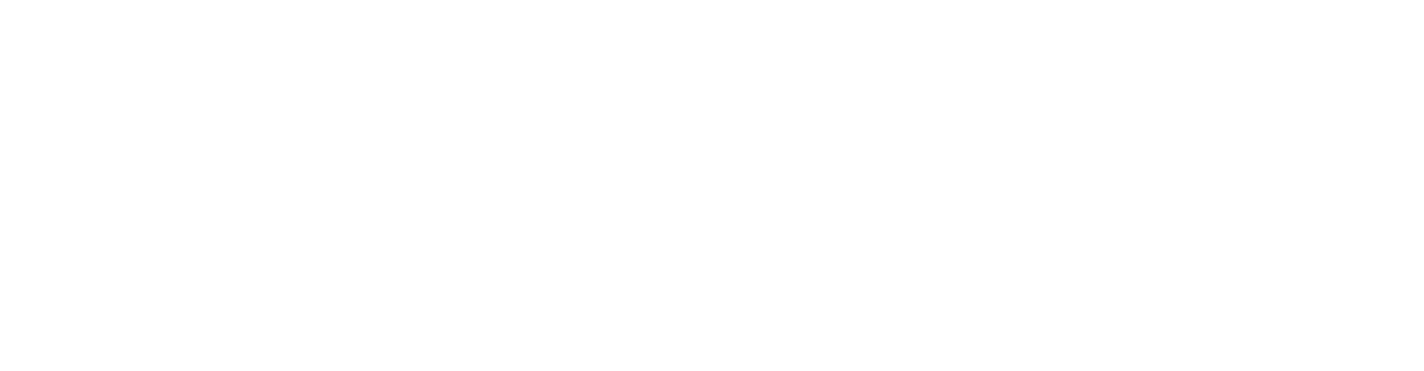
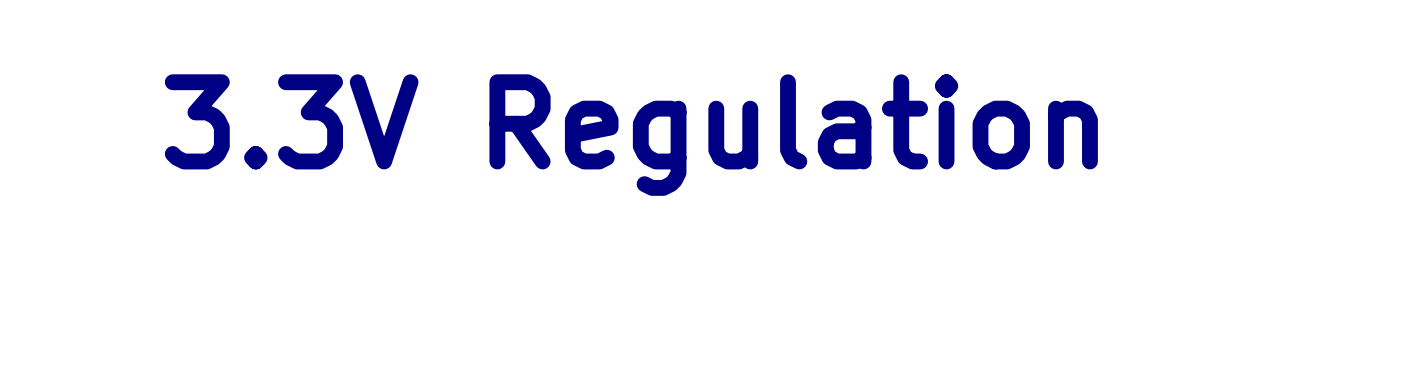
text: none -> 3.3V Regulation (631, 135)

